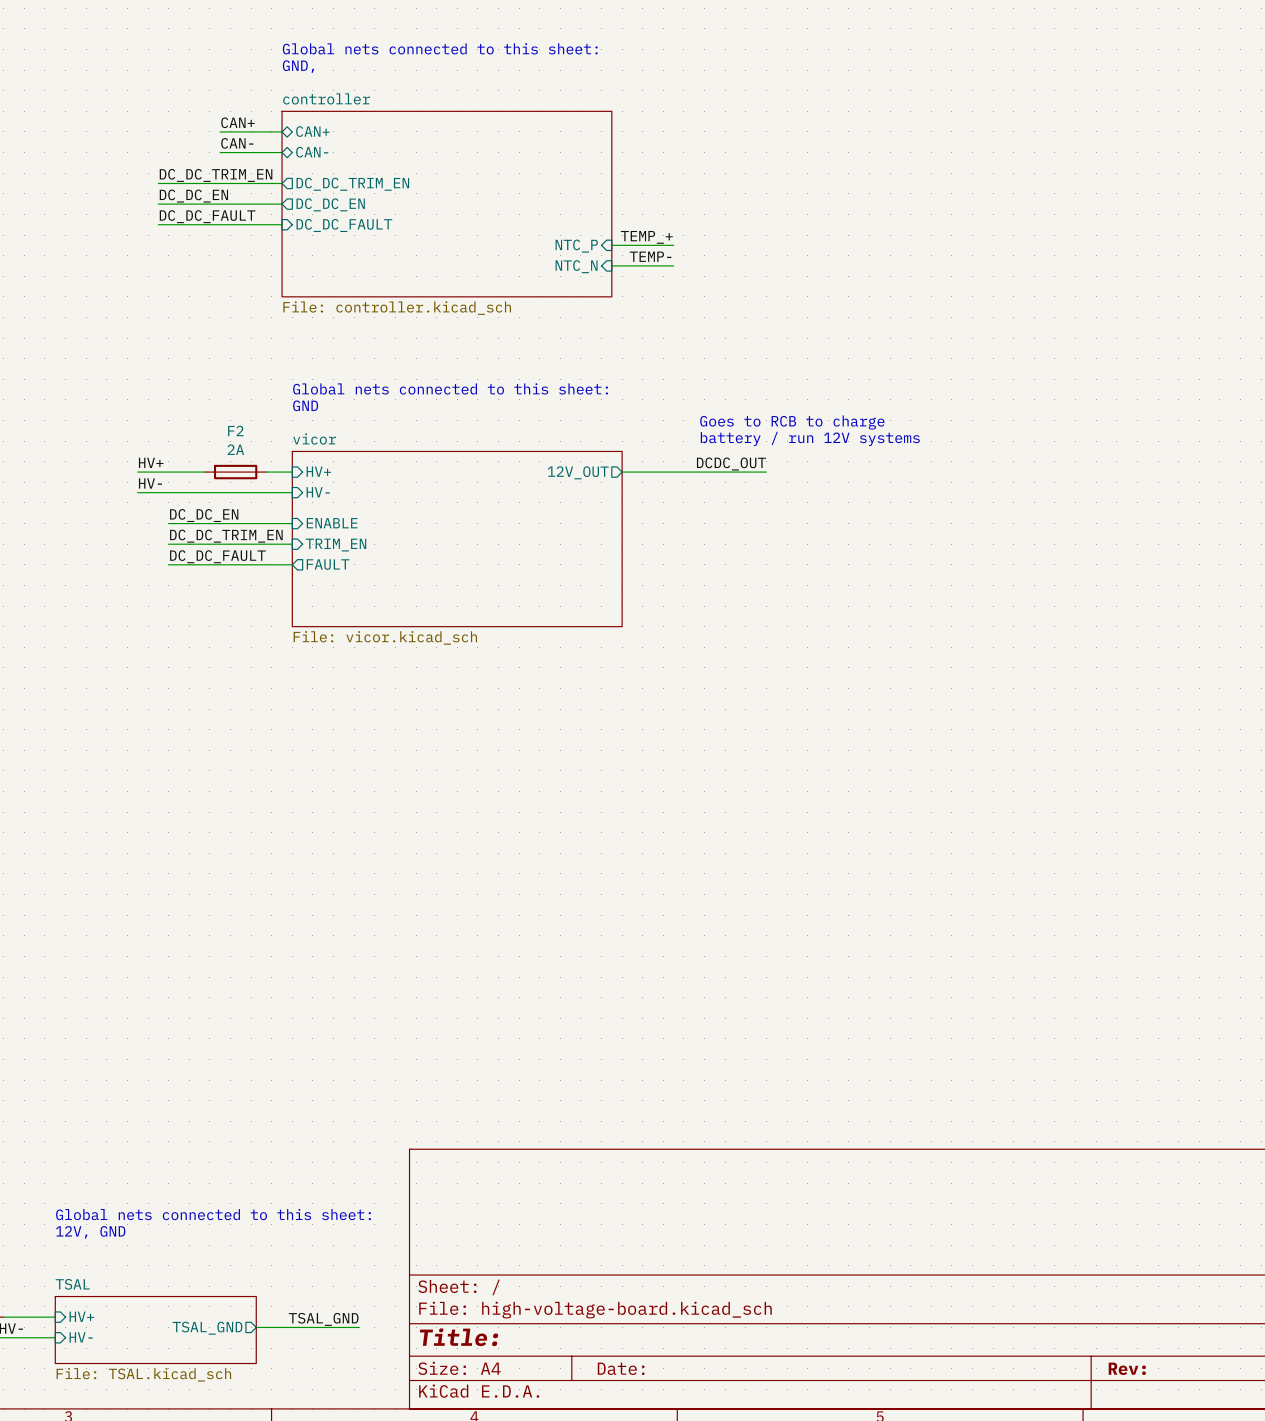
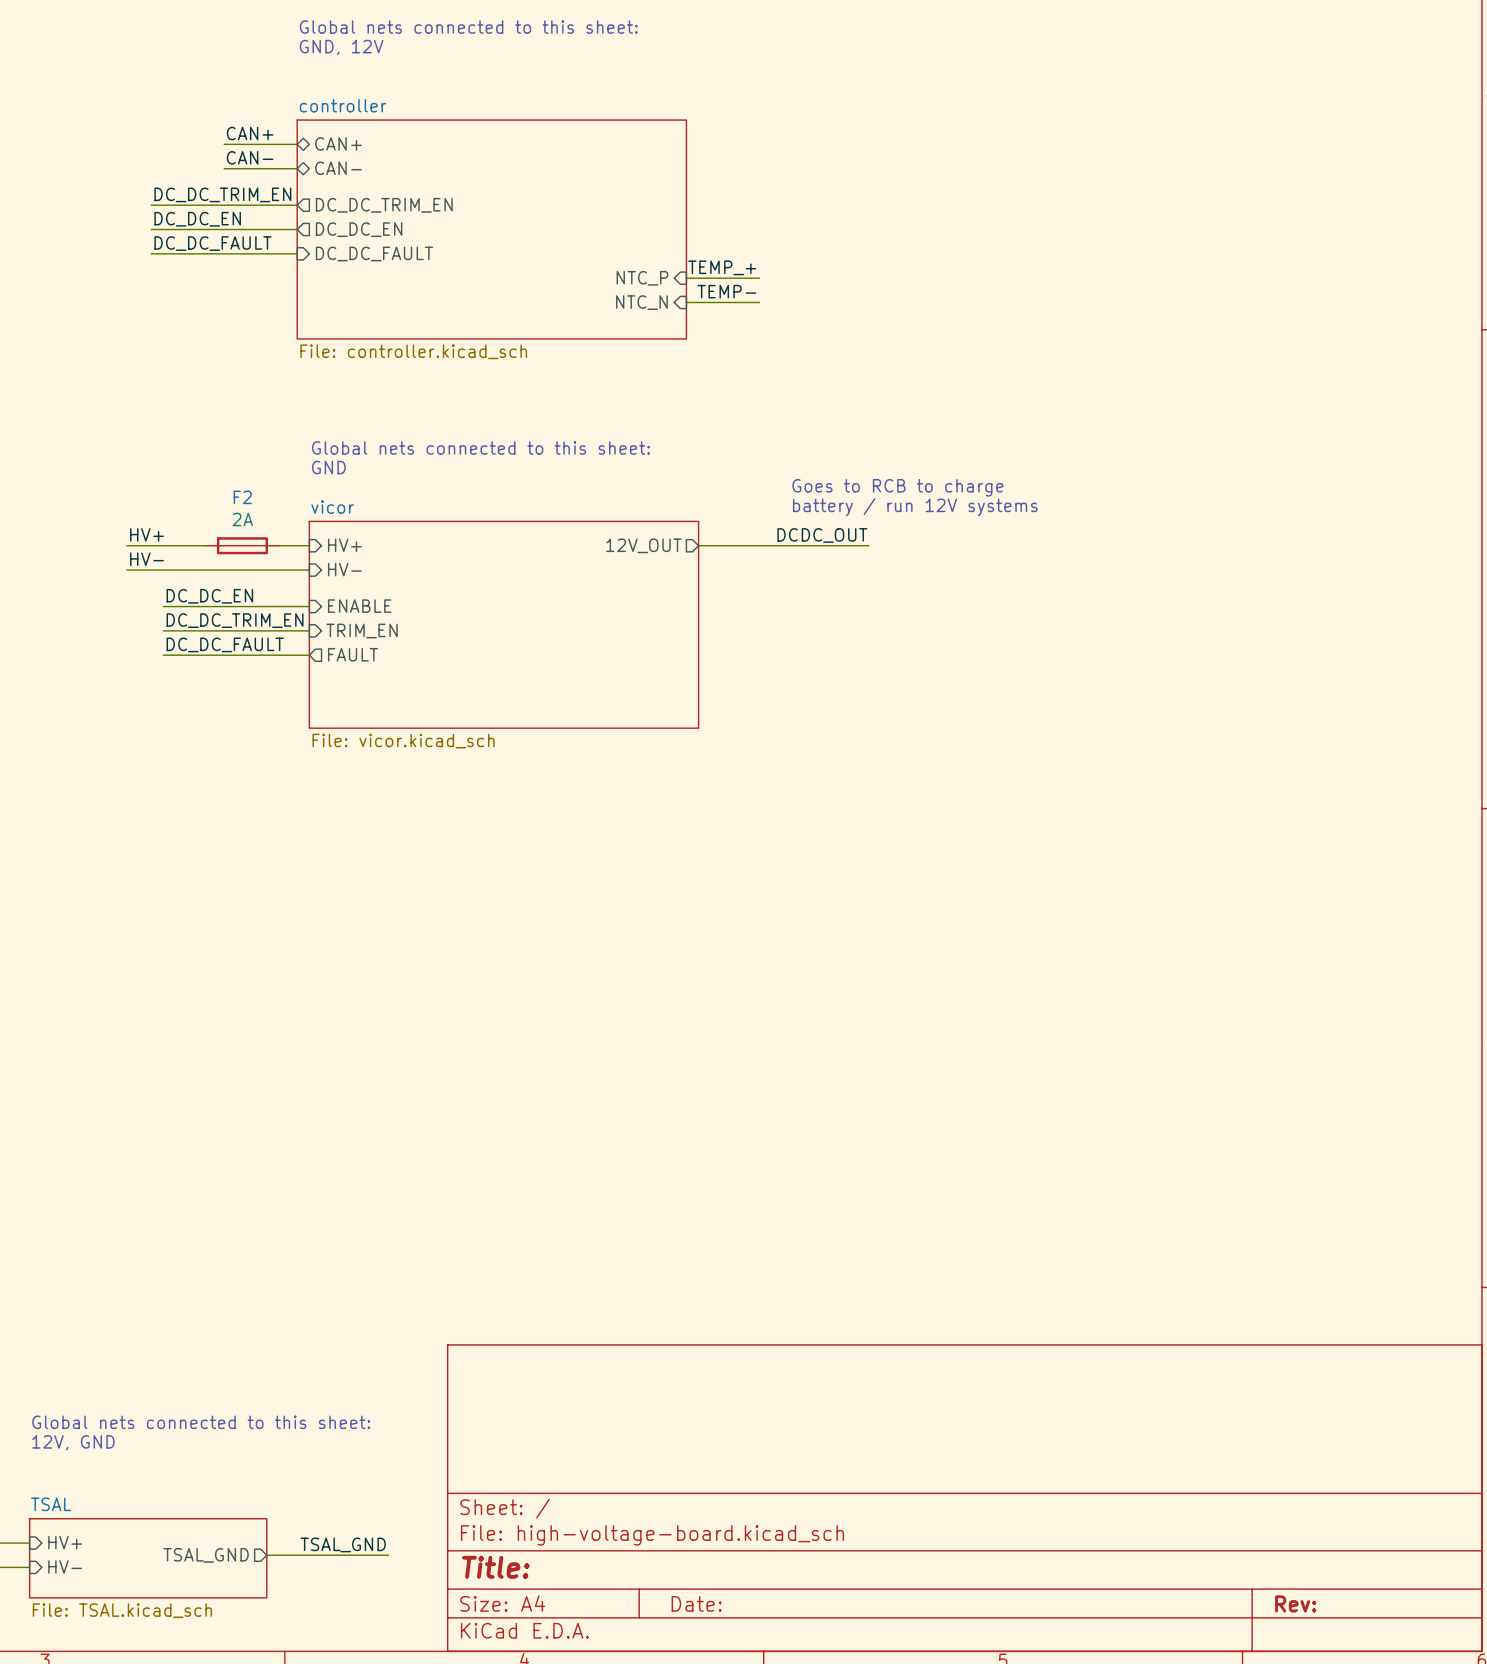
text: none -> Global nets connected to this sheet: (468, 27)
text: Global nets connected to this sheet: (440, 48) -> GND, 12V (341, 47)
text: GND, (298, 66) -> none

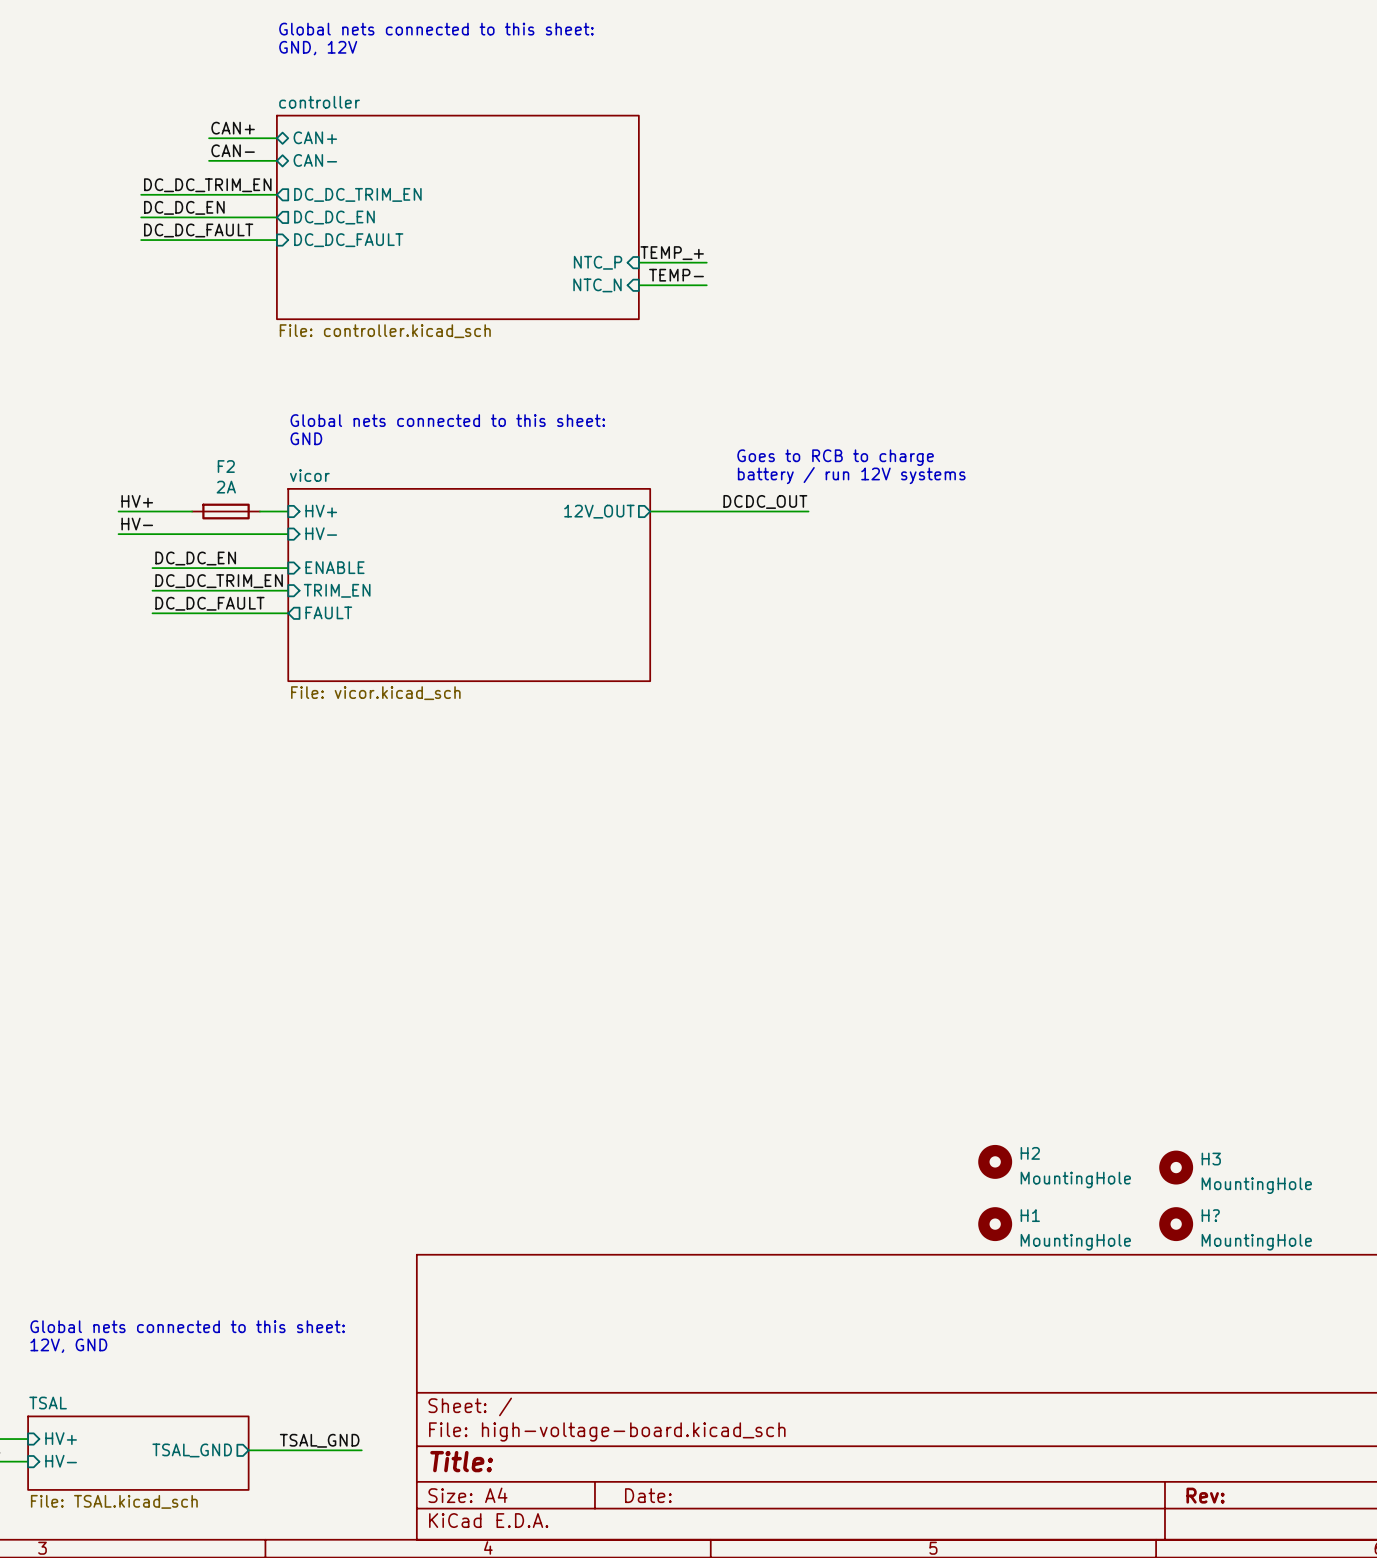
H2: none -> MountingHole (995, 1161)
H3: none -> MountingHole (1176, 1167)
H1: none -> MountingHole (995, 1224)
H?: none -> MountingHole (1176, 1224)

